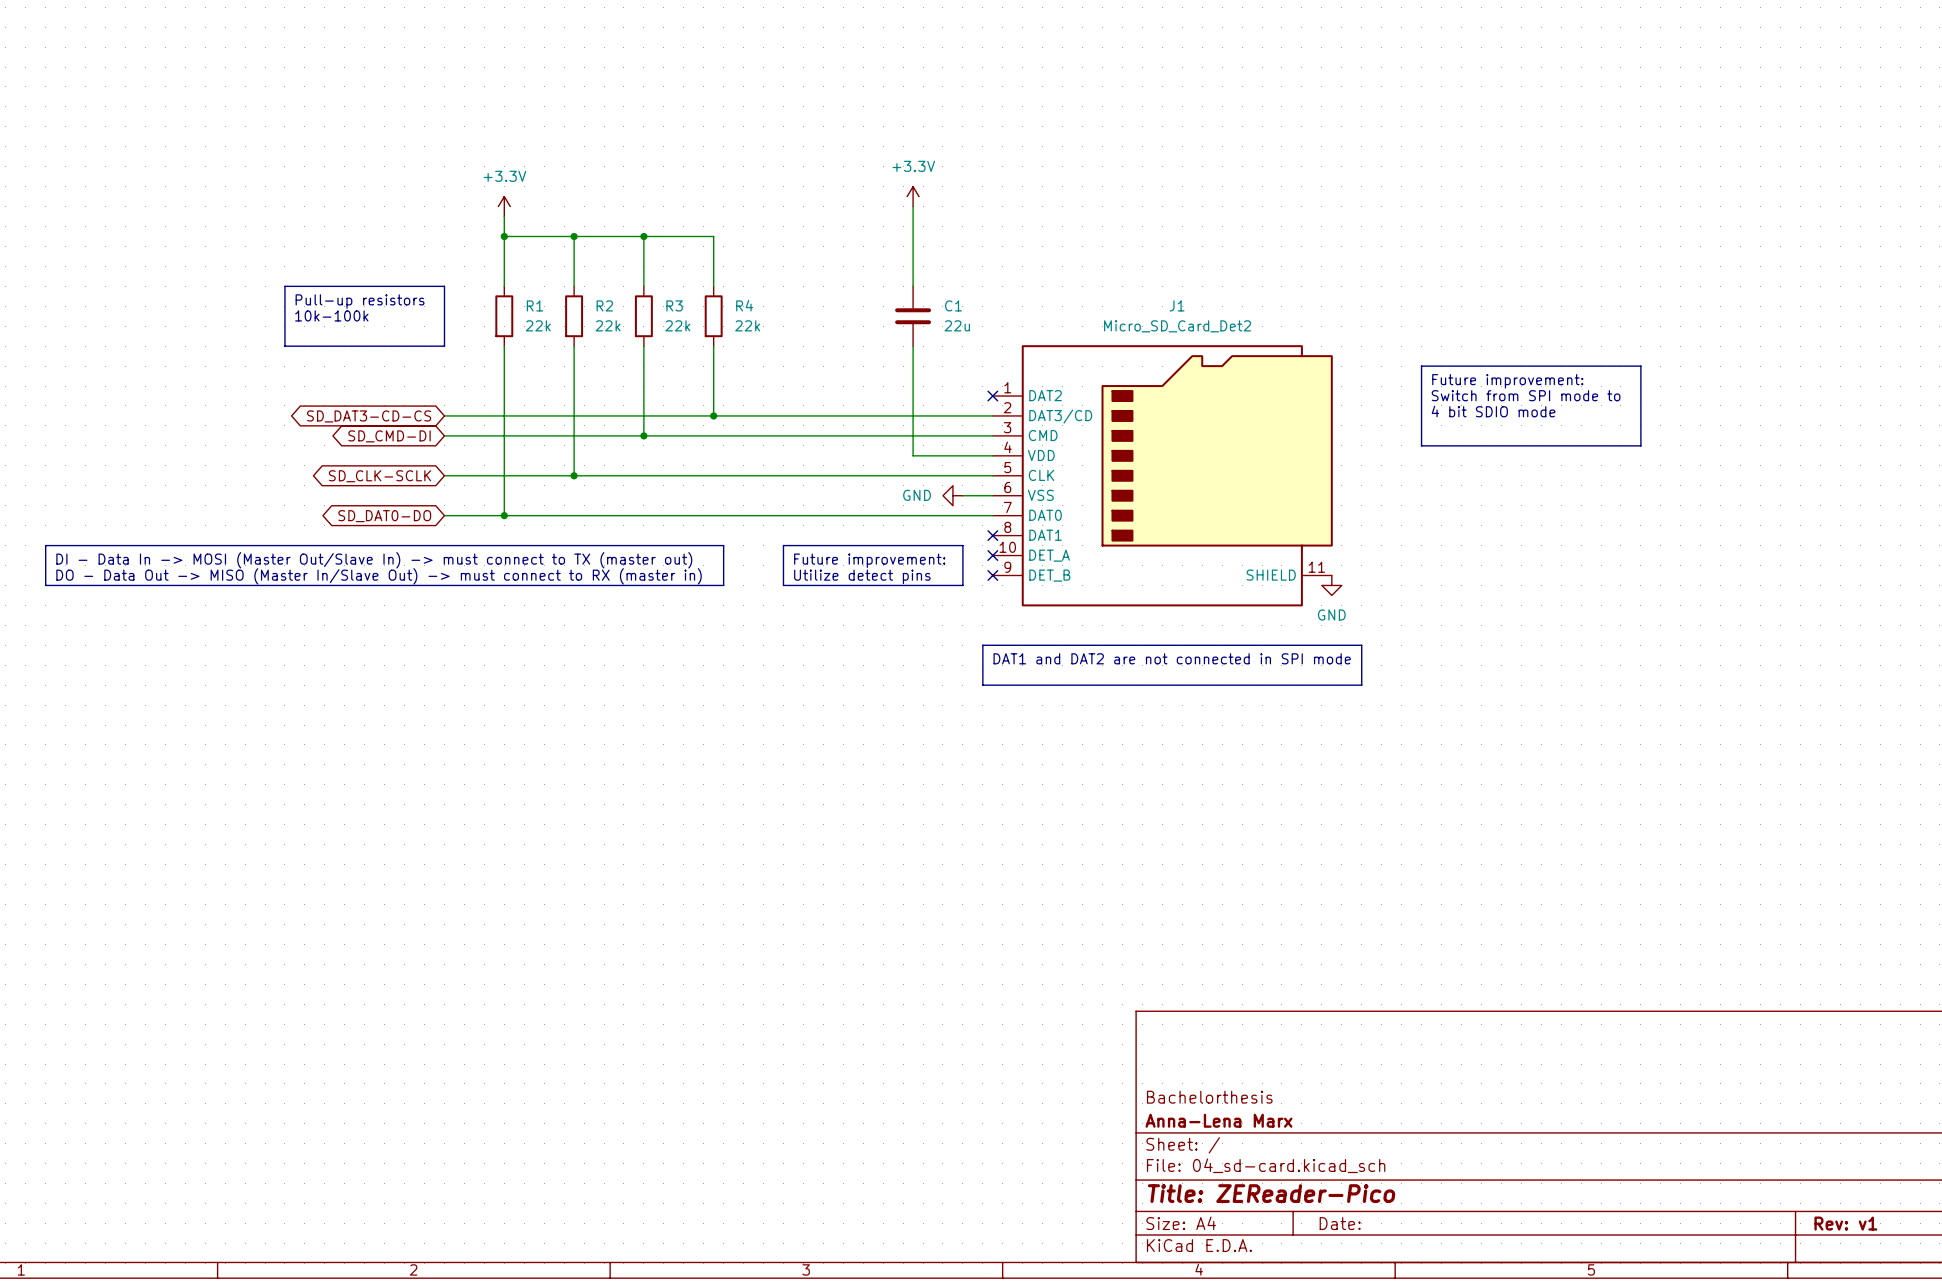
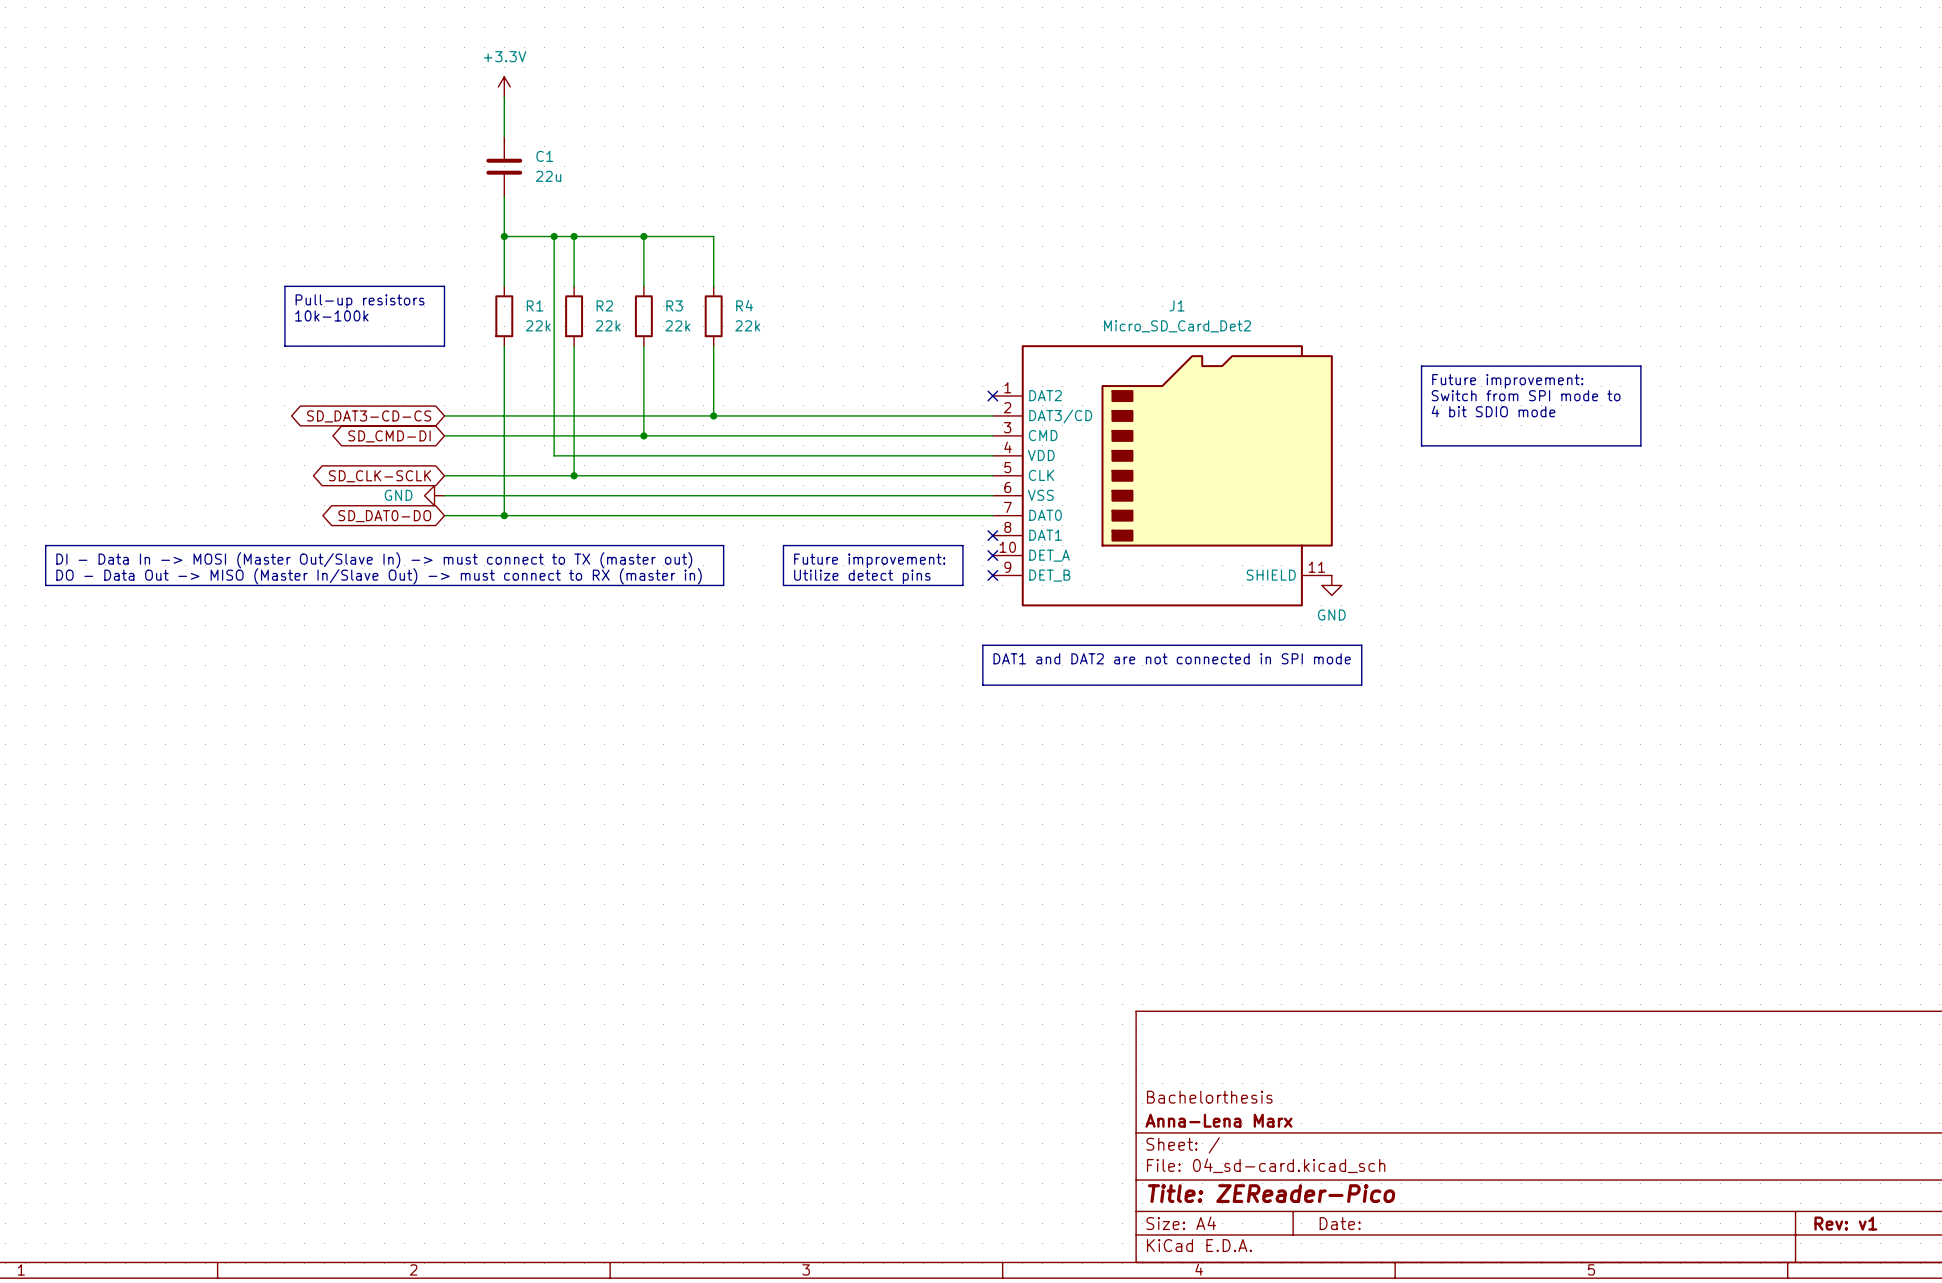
wire: none -> (504, 96) (504, 136)
power symbol: +3.3V (913, 196) -> none
power symbol position: +3.3V (504, 206) -> +3.3V (504, 86)
wire: (913, 206) (913, 286) -> none
junction: none -> (554, 236)
C1 position: (913, 316) -> (504, 166)
wire: (913, 346) (913, 455) -> (554, 236) (554, 455) (913, 455)
power symbol: none -> GND (434, 495)
wire: none -> (444, 495) (962, 495)
power symbol: GND (952, 495) -> none

